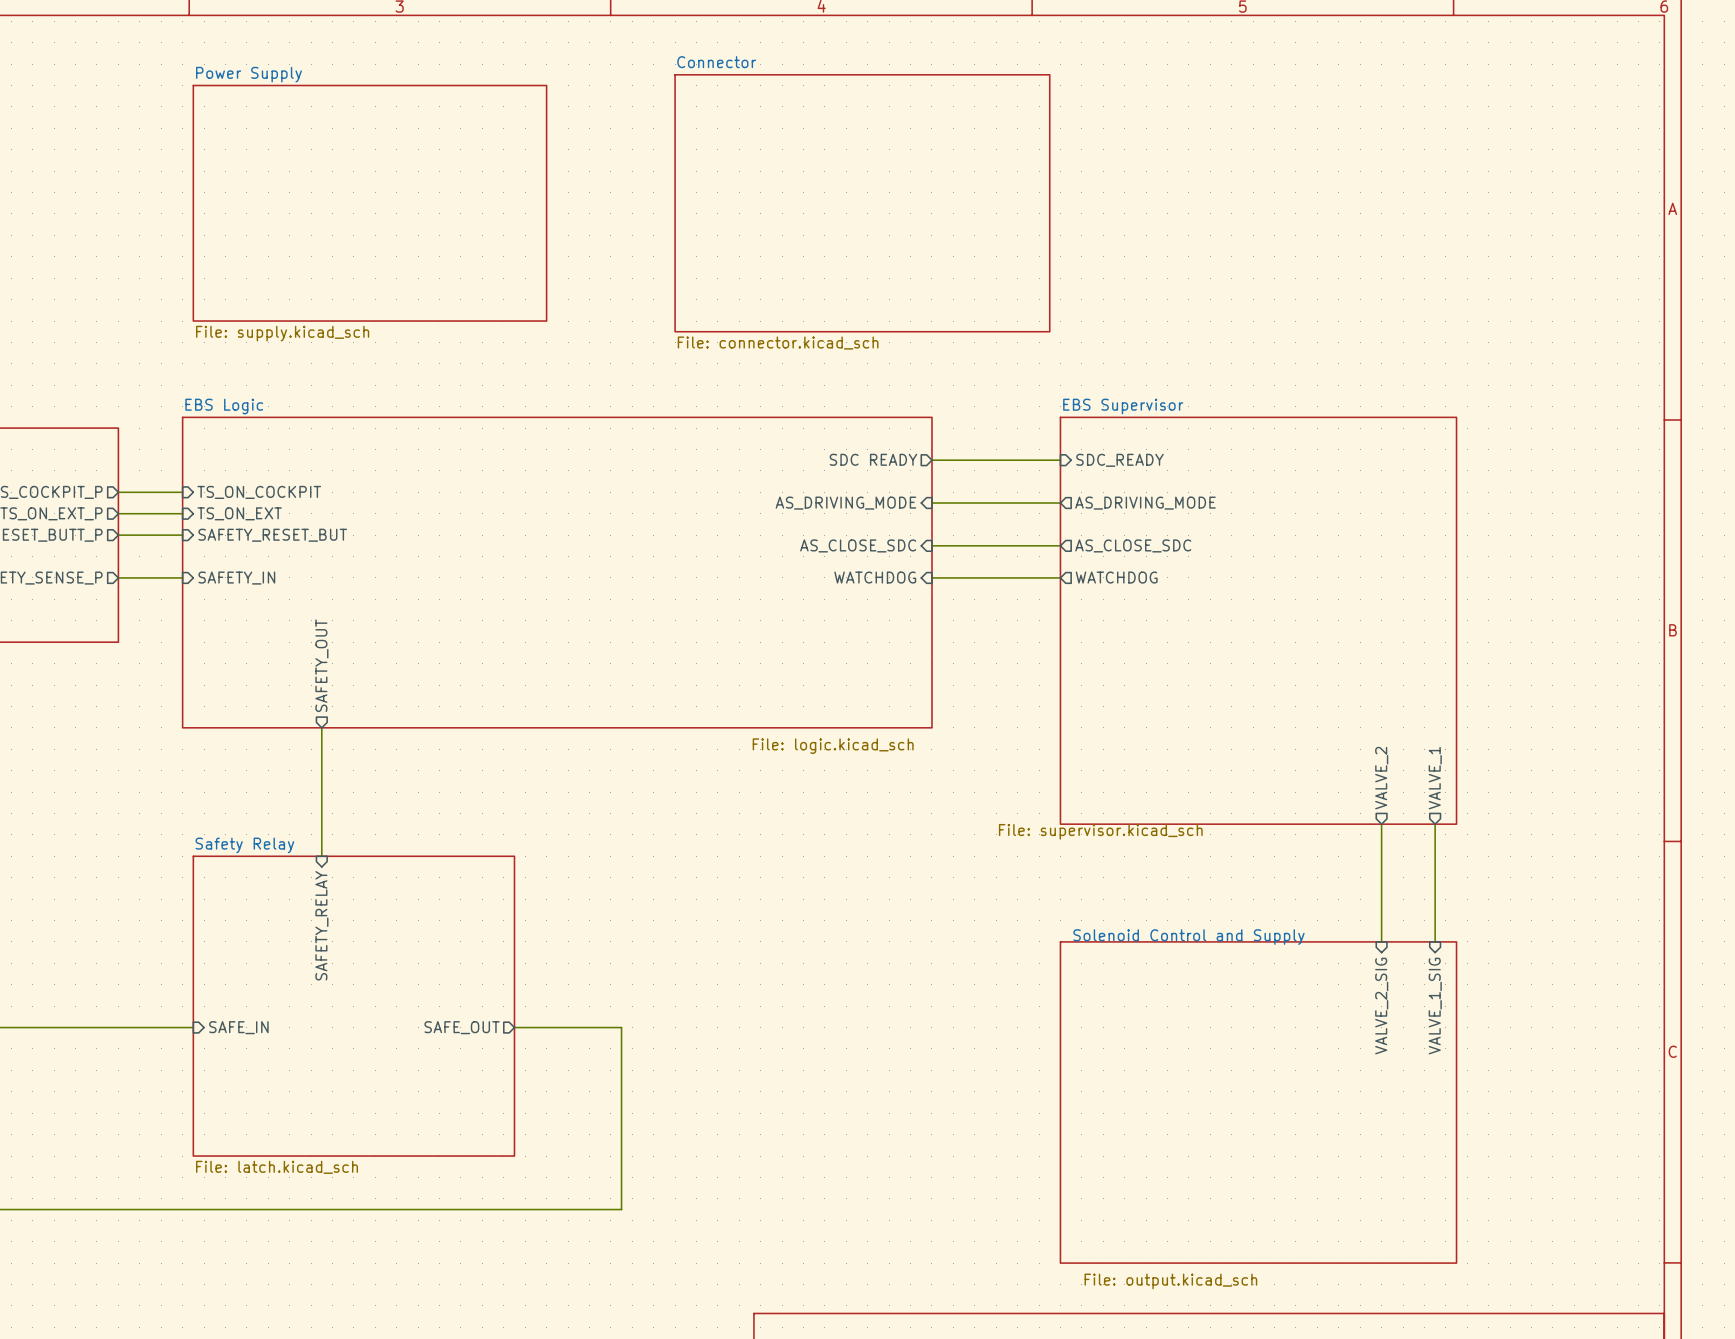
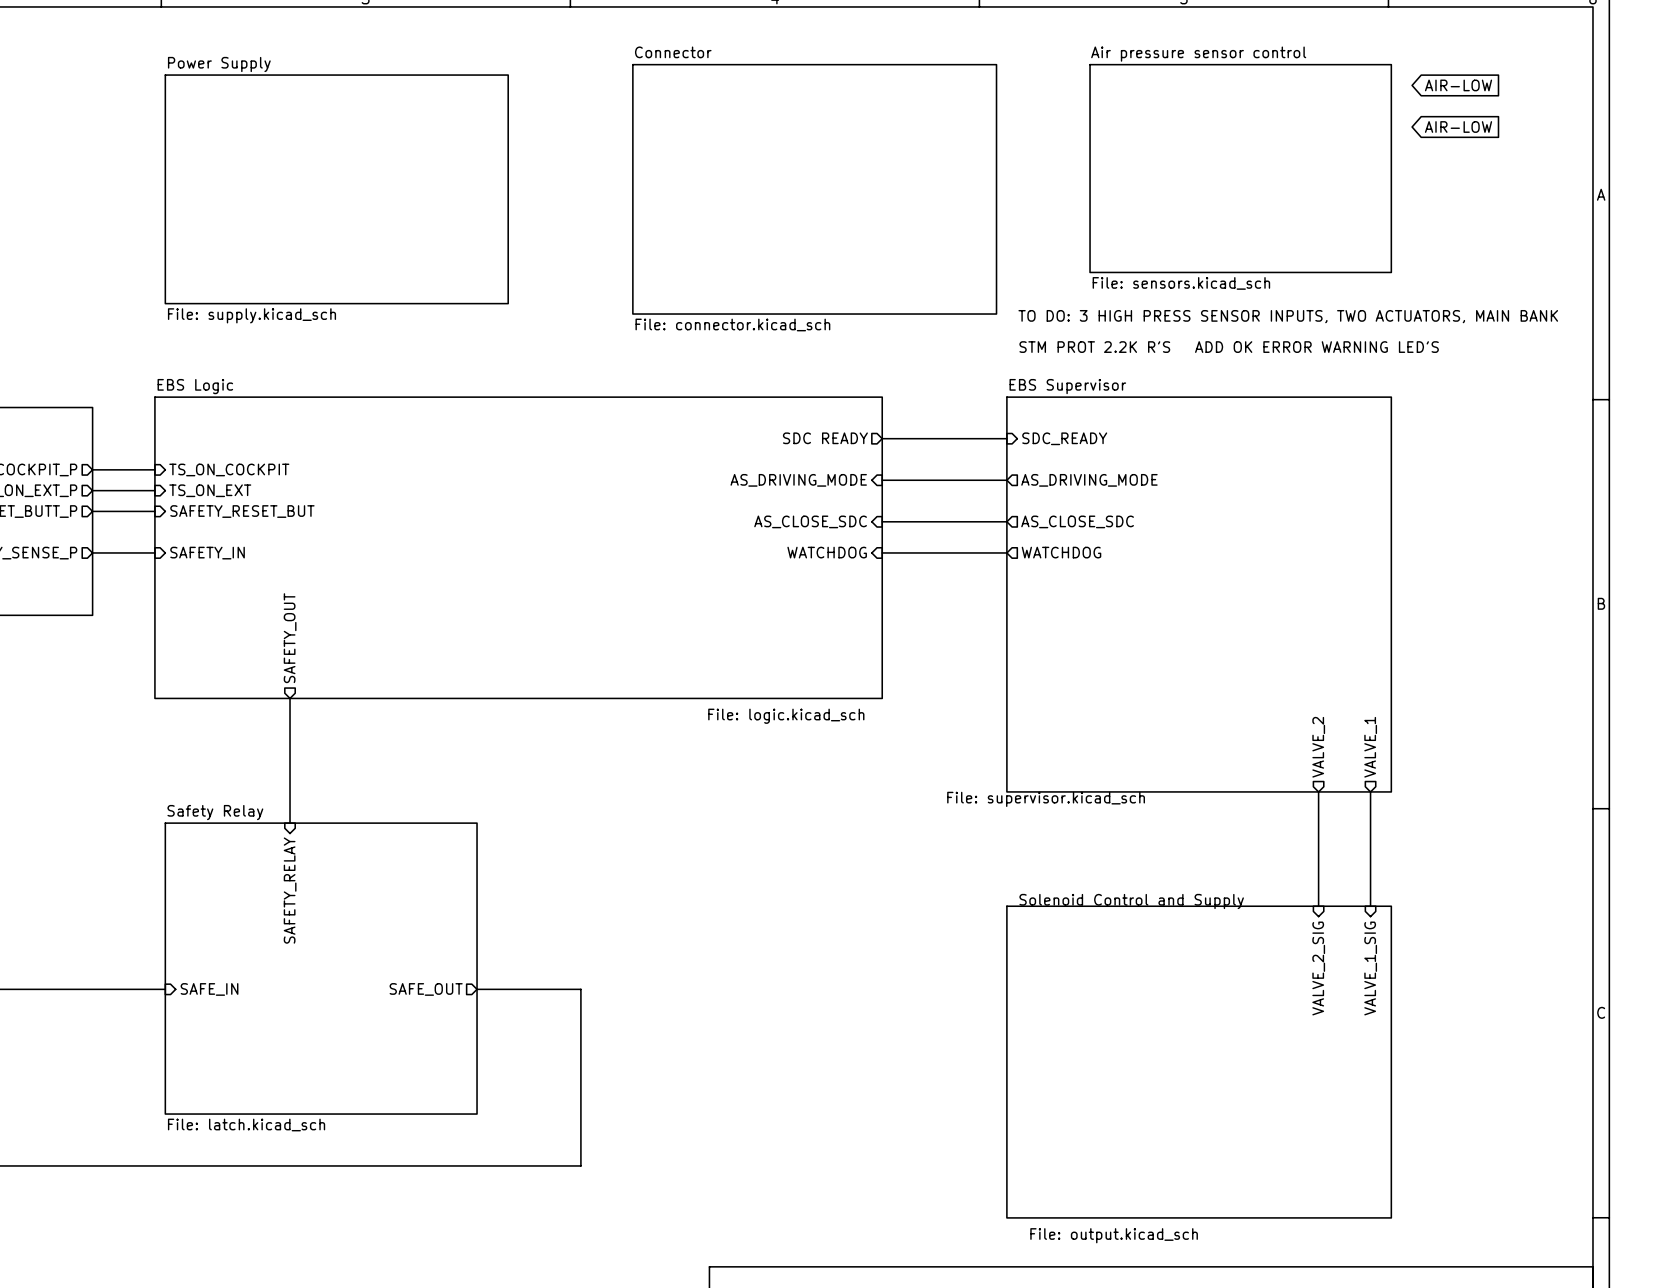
global label: none -> AIR-LOW (1458, 85)
global label: none -> AIR-LOW (1458, 126)
sheet Air pressure sensor control: none -> File: sensors.kicad_sch (1240, 168)
text: none -> TO DO: 3 HIGH PRESS SENSOR INPUTS, TWO ACTUATORS, MAIN BANK (1288, 316)
text: none -> STM PROT 2.2K R'S (1094, 347)
text: none -> ADD OK ERROR WARNING LED'S (1316, 347)

